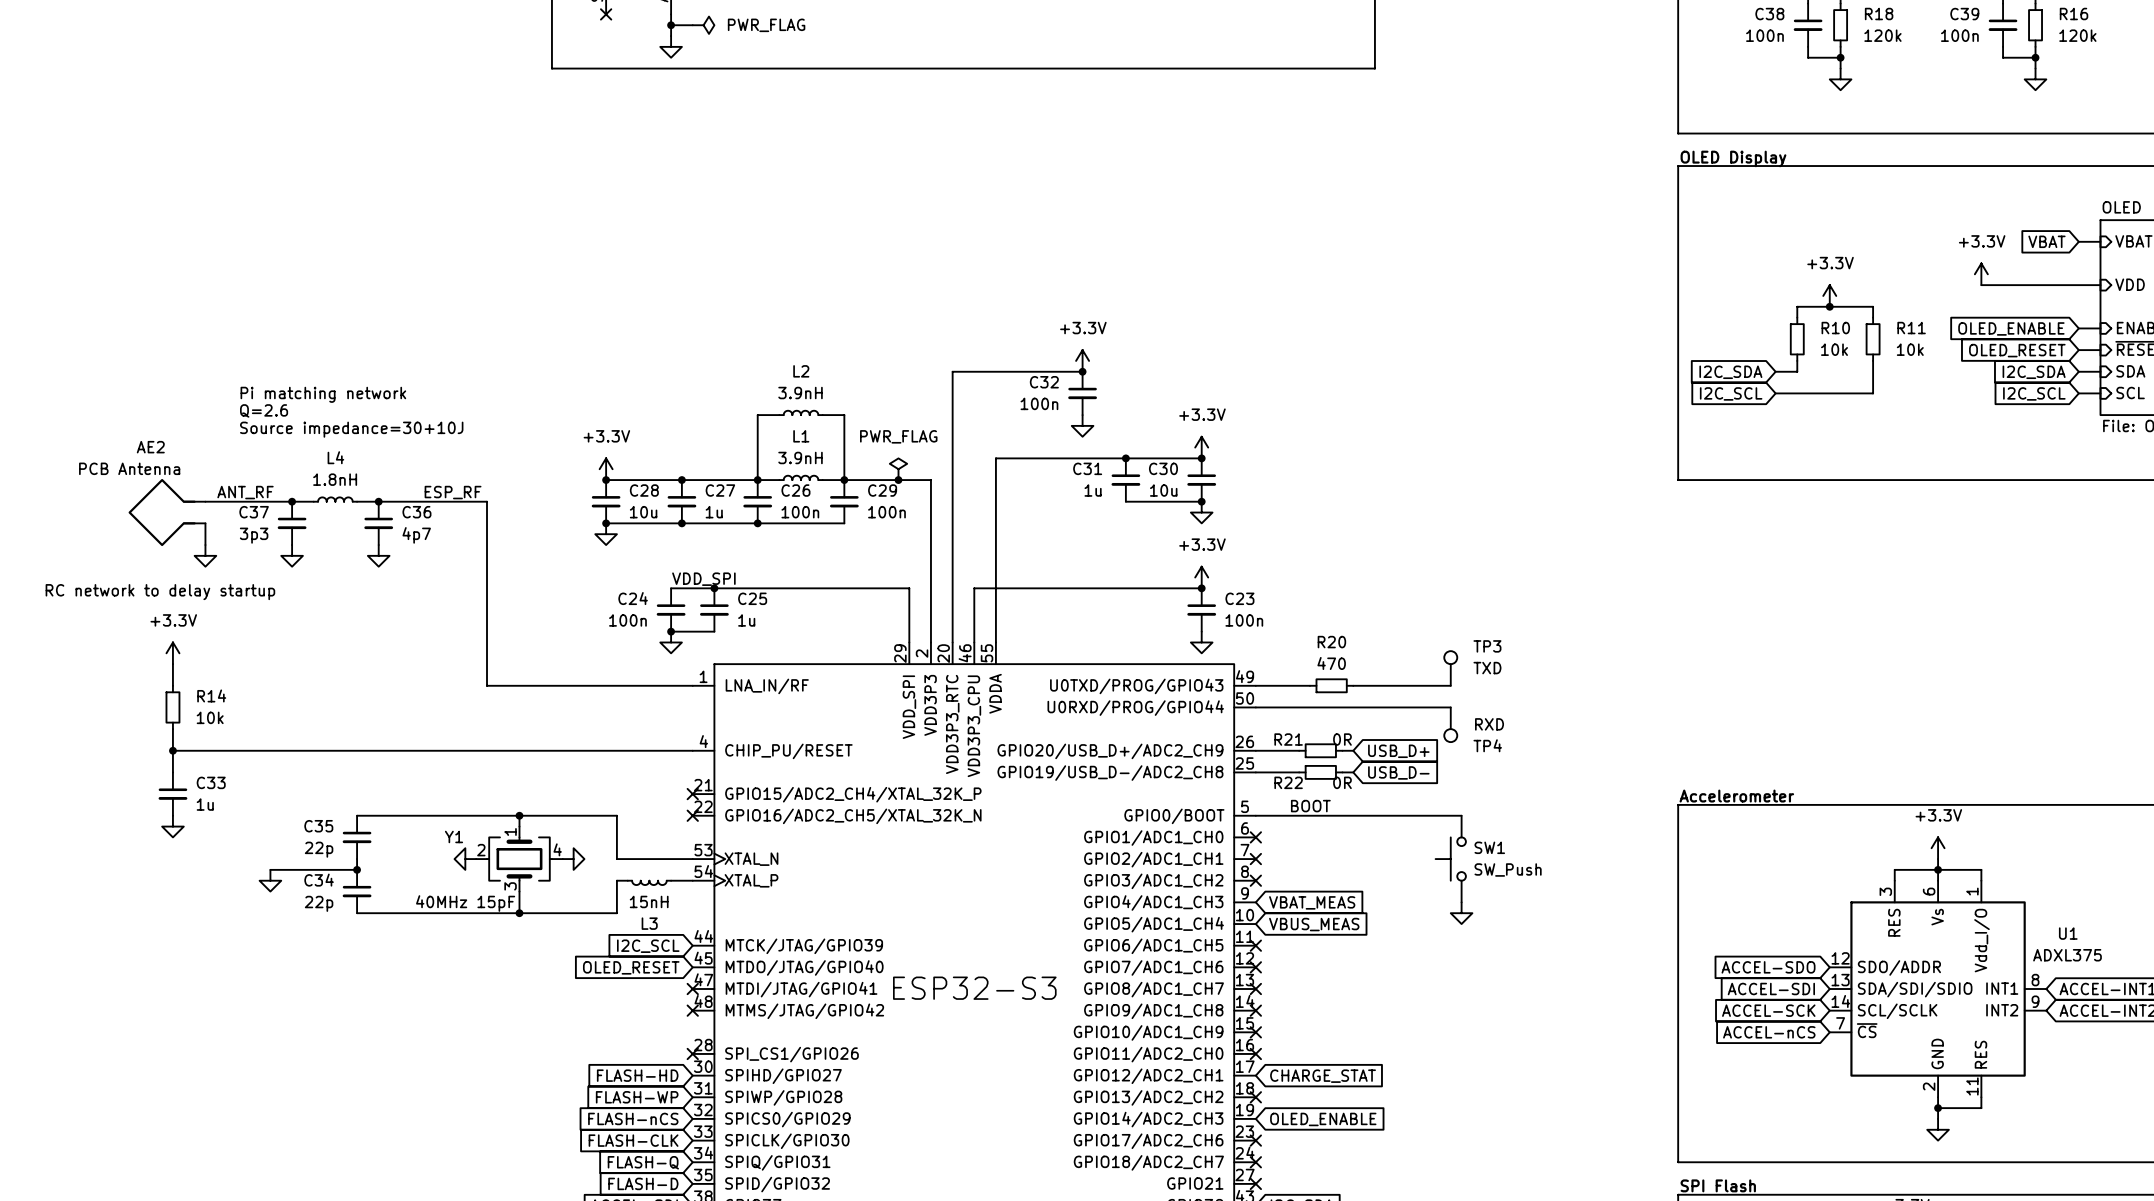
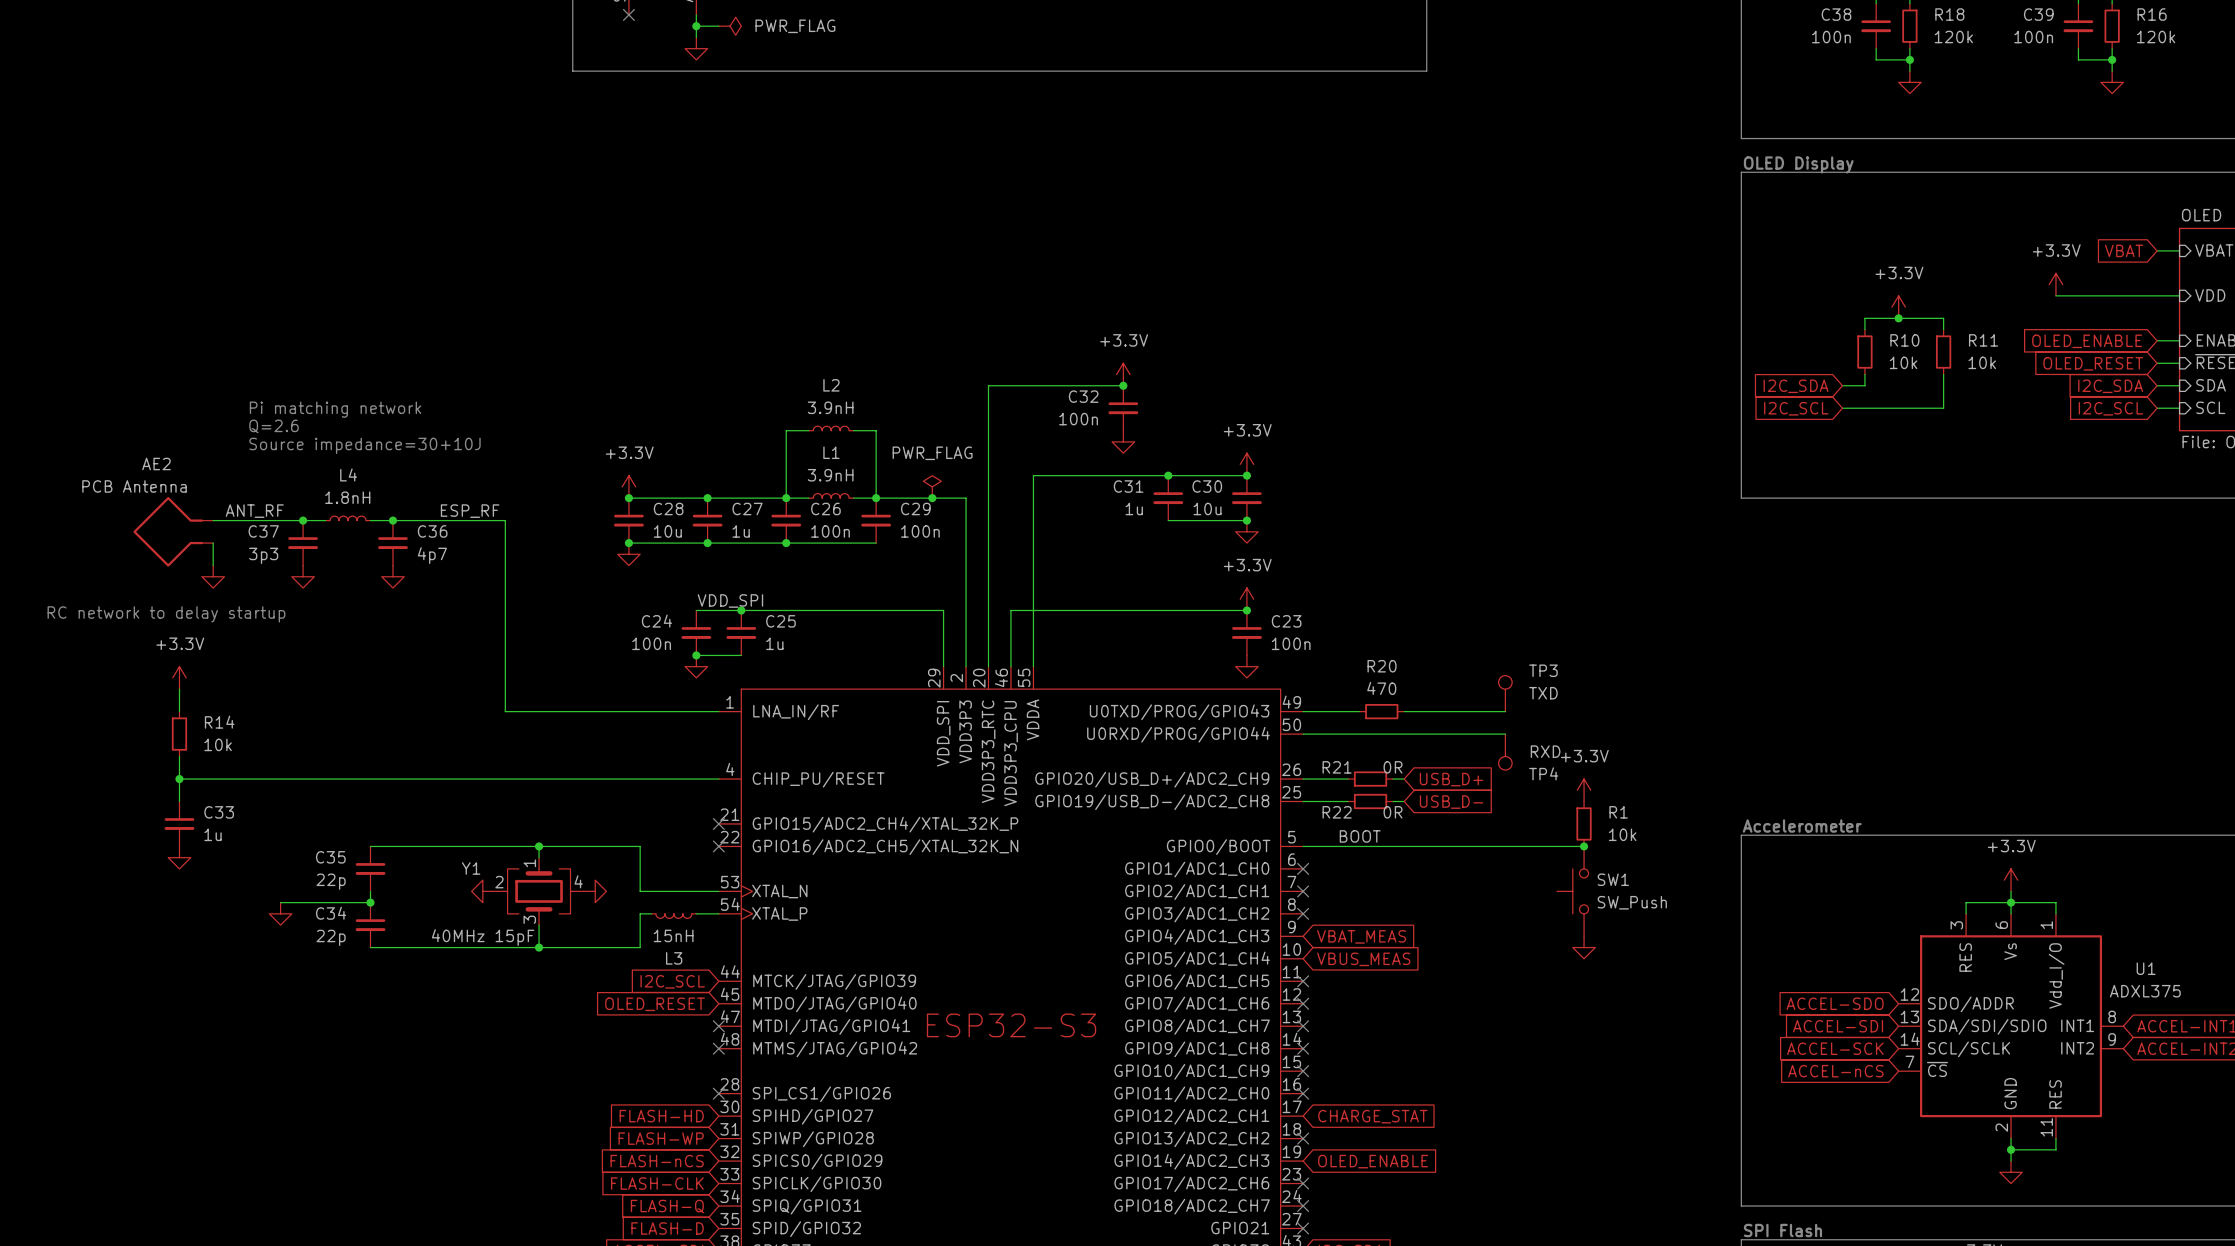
power symbol: none -> +3.3V (1584, 790)
R1: none -> 10k (1584, 823)
wire: none -> (1516, 846) (1584, 846)
junction: none -> (1584, 846)
SW1 position: (1450, 859) -> (1572, 891)
power symbol position: (1461, 913) -> (1584, 947)

